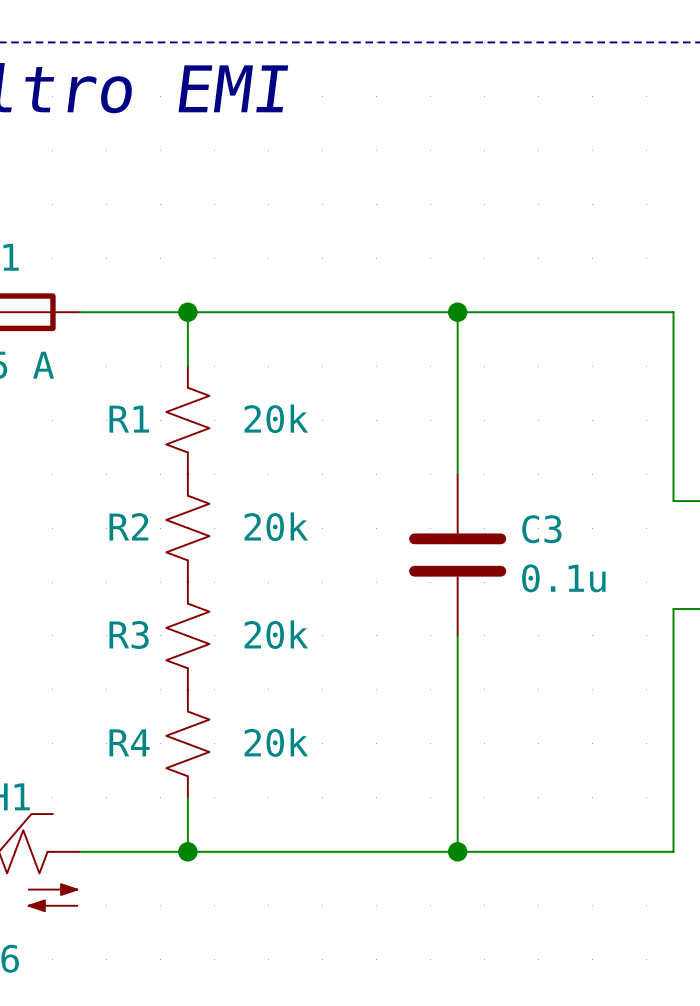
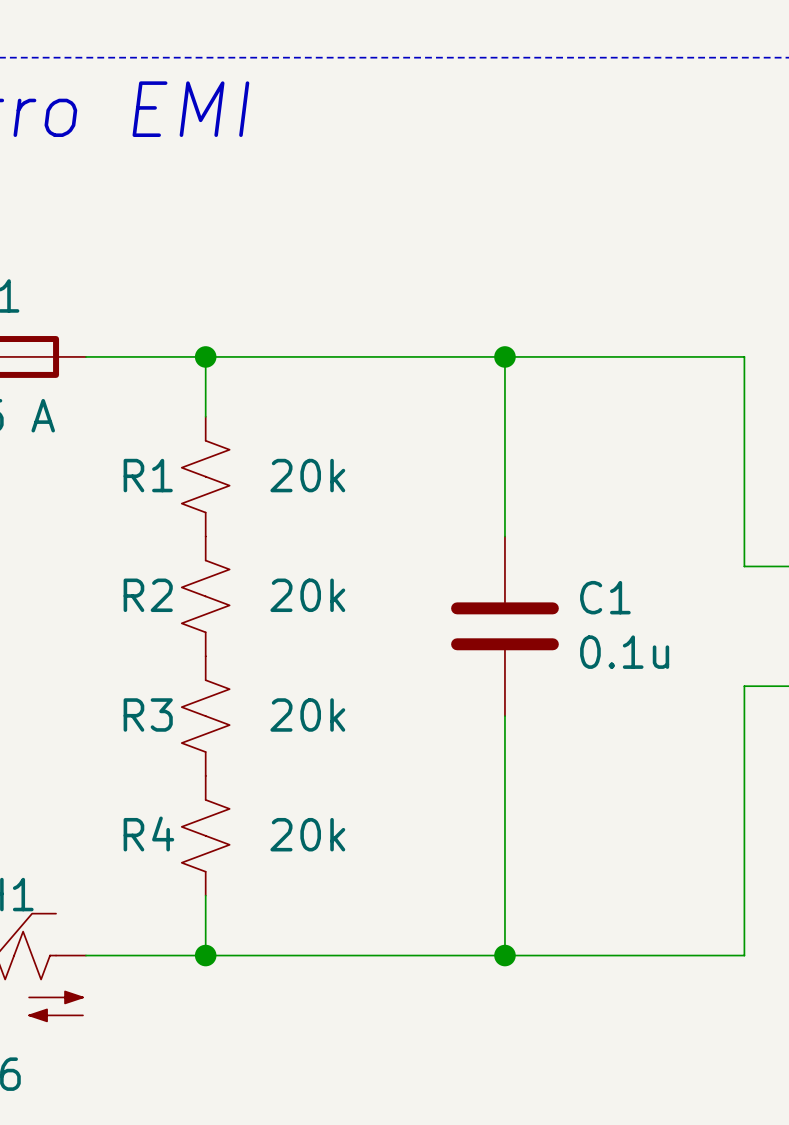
C3 name: C3 (541, 529) -> C1 (605, 597)

